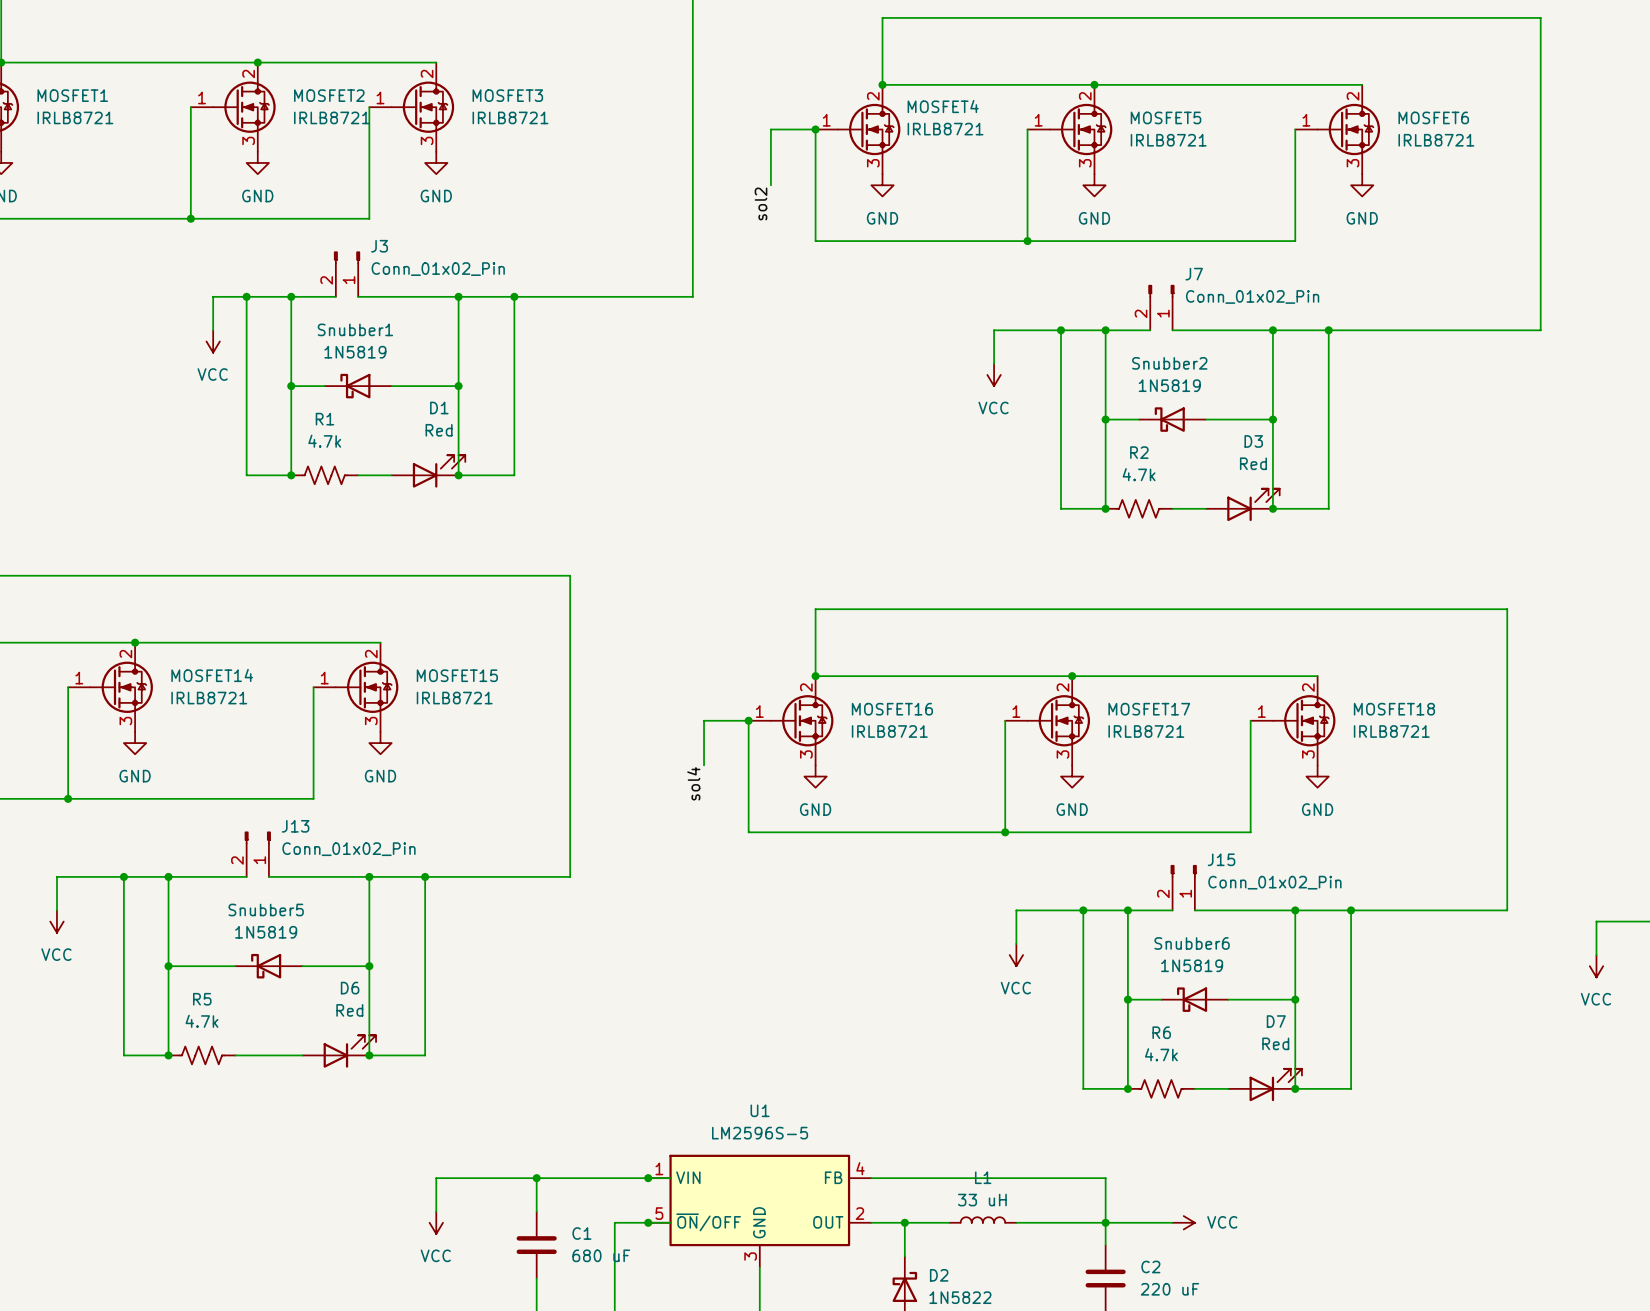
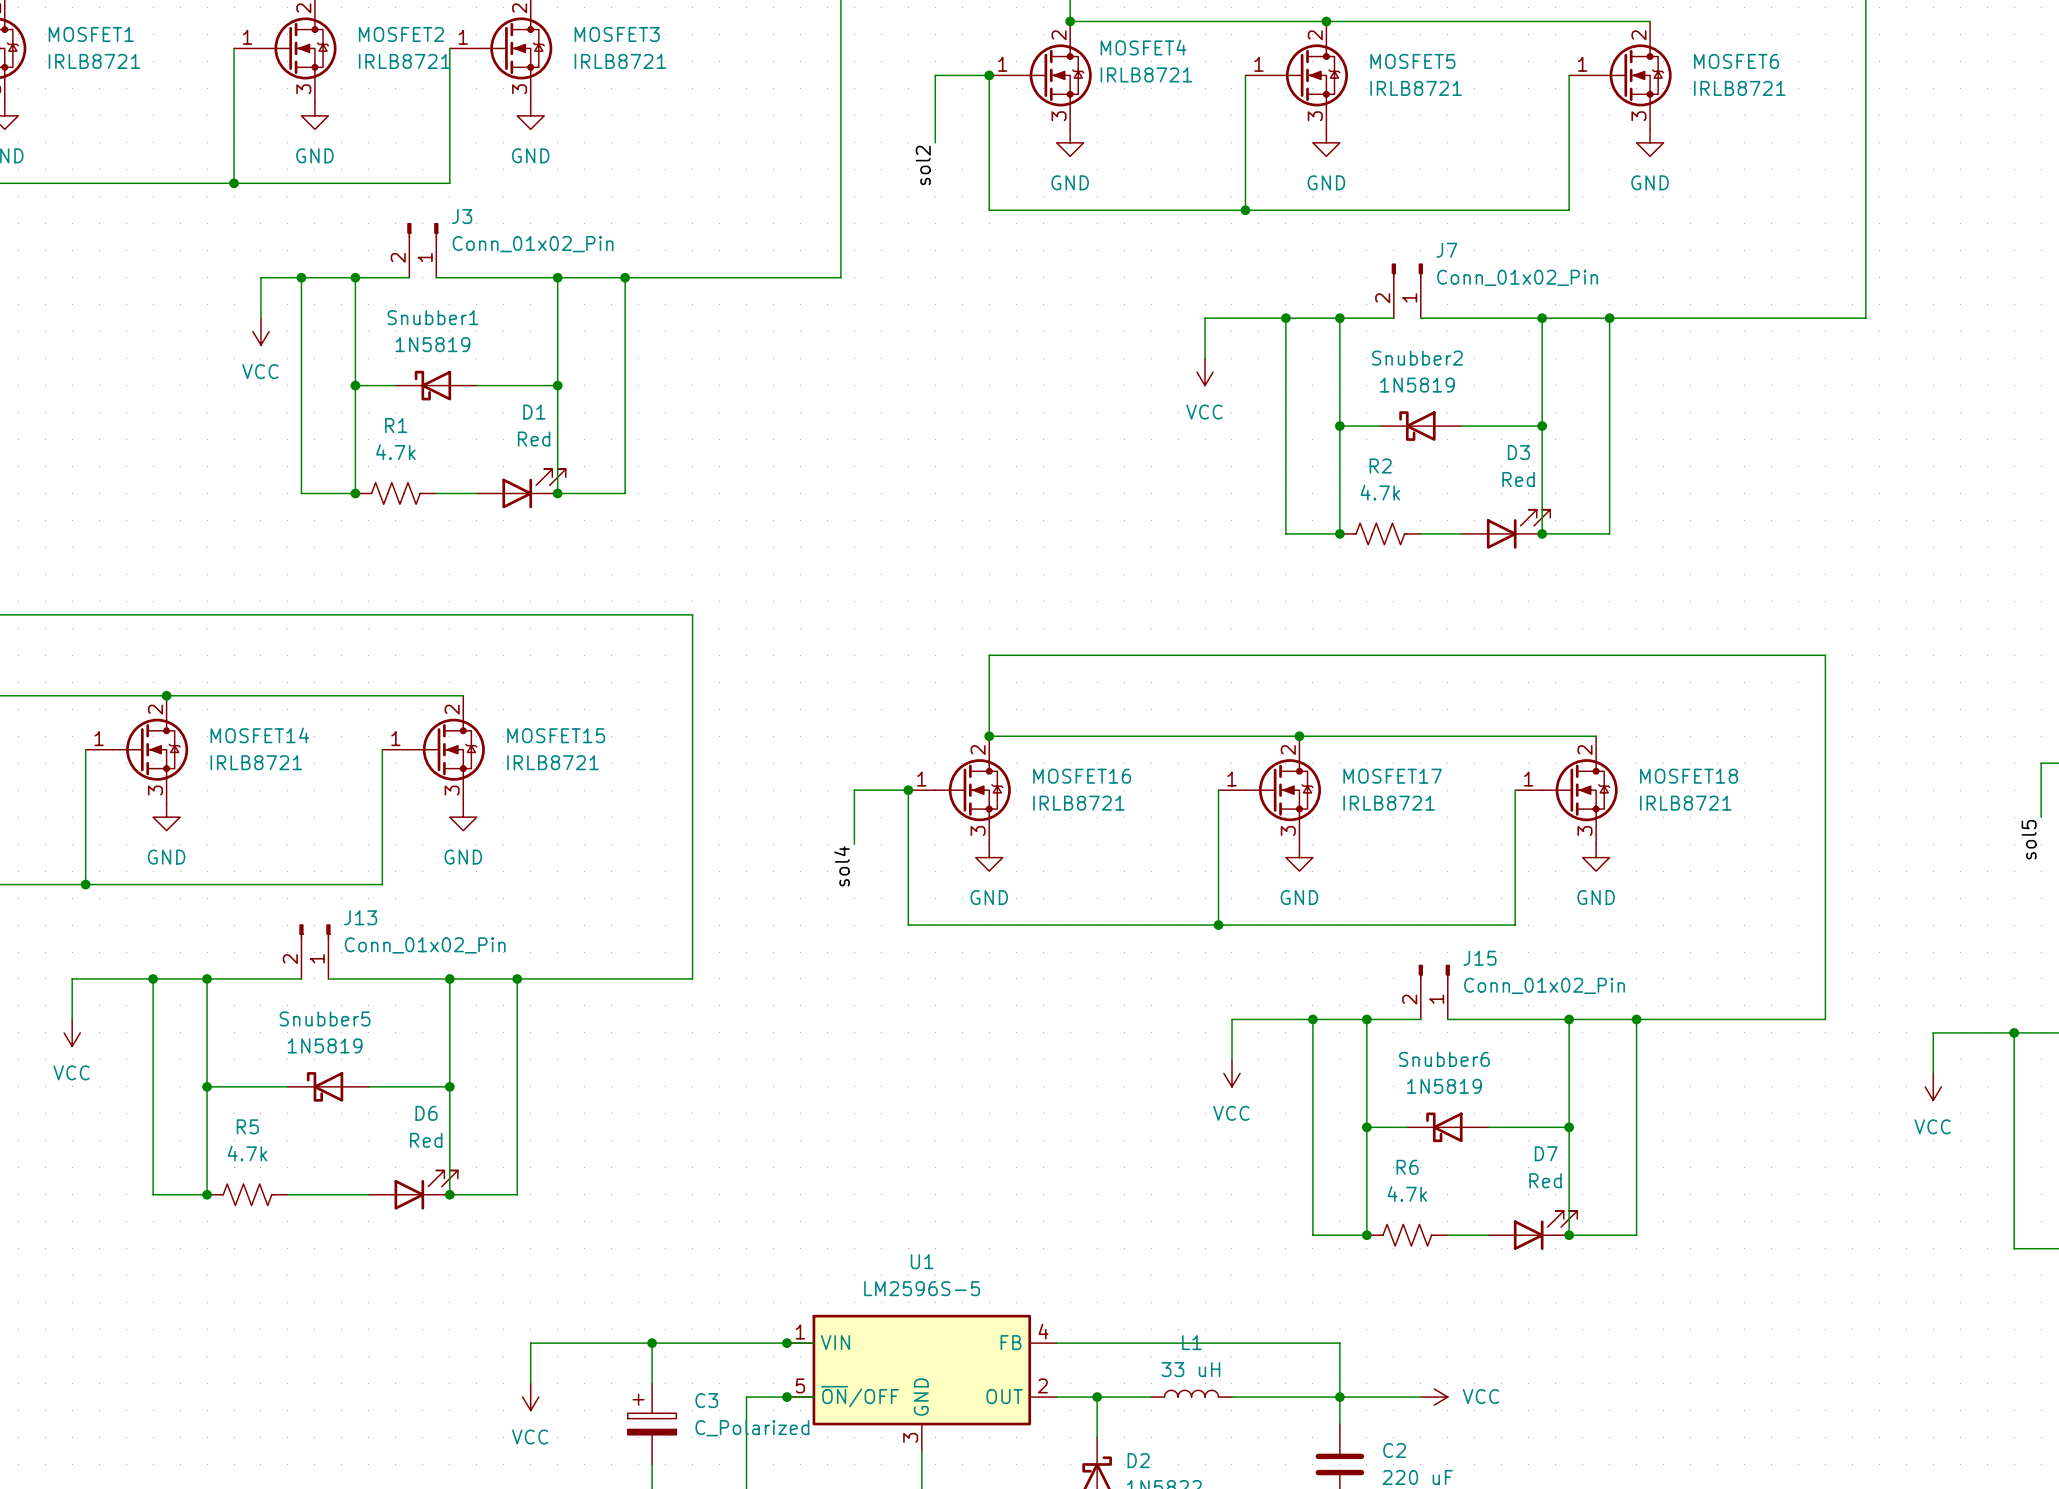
C1: 680 uF (536, 1245) -> none
C3: none -> C_Polarized (652, 1424)

